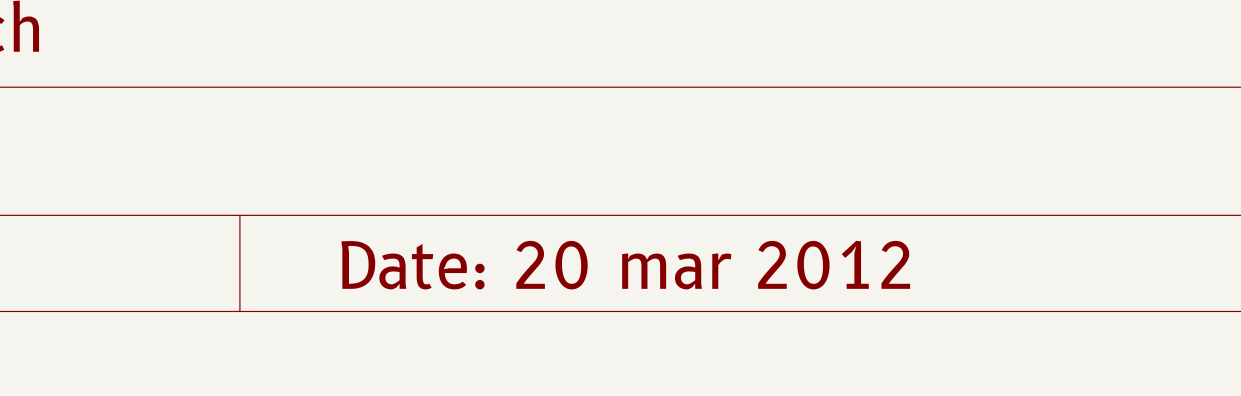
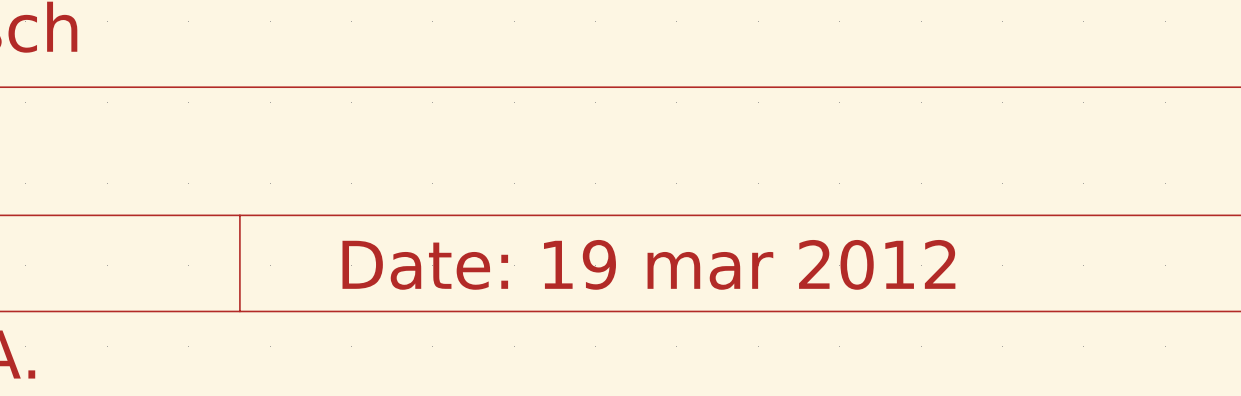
title block: Date: 20 mar 2012 (625, 265) -> Date: 19 mar 2012 (648, 264)

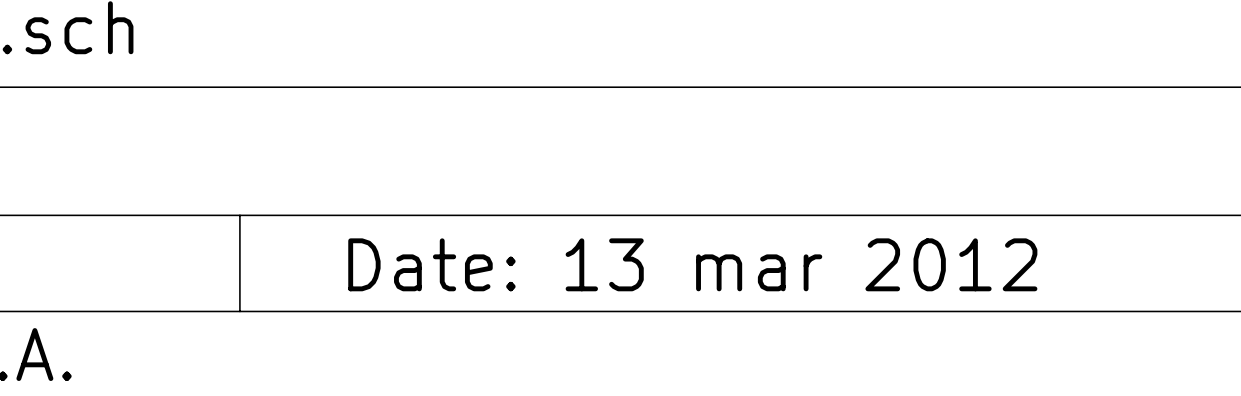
title block: Date: 19 mar 2012 (648, 264) -> Date: 13 mar 2012 (692, 264)

